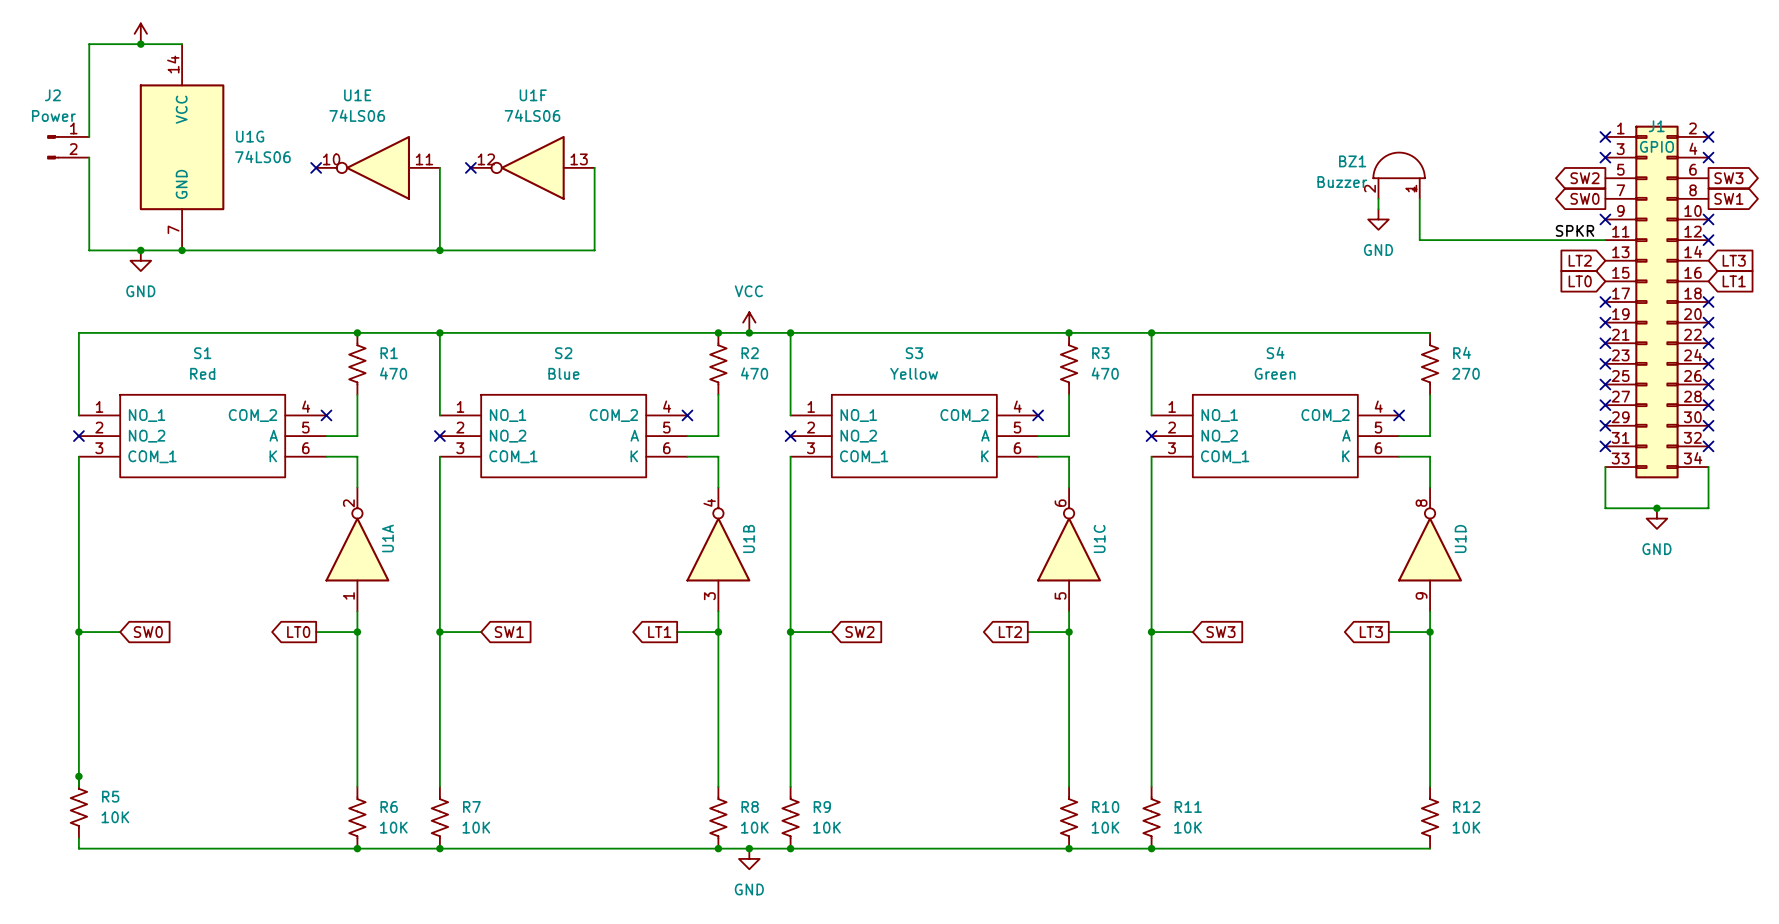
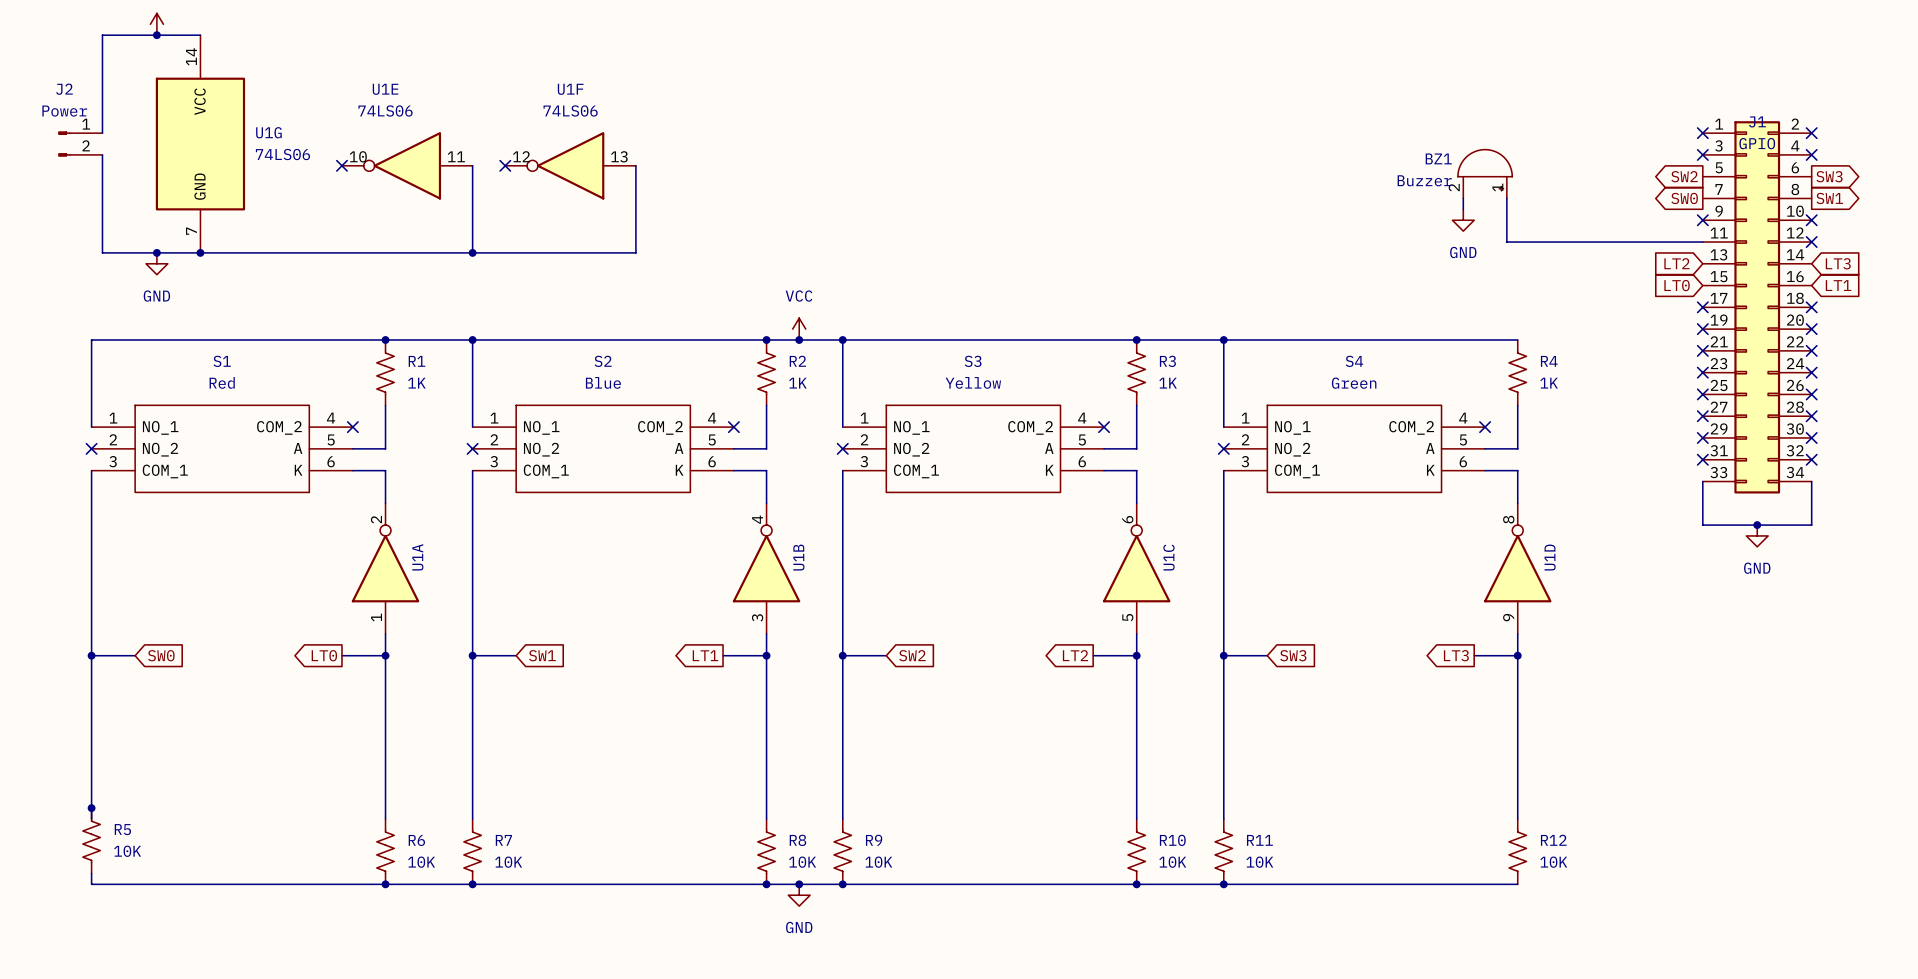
label: SPKR (1575, 230) -> none
R1 value: 470 (393, 373) -> 1K (416, 383)
R2 value: 470 (754, 373) -> 1K (797, 383)
R3 value: 470 (1105, 373) -> 1K (1168, 383)
R4 value: 270 (1465, 373) -> 1K (1549, 383)

